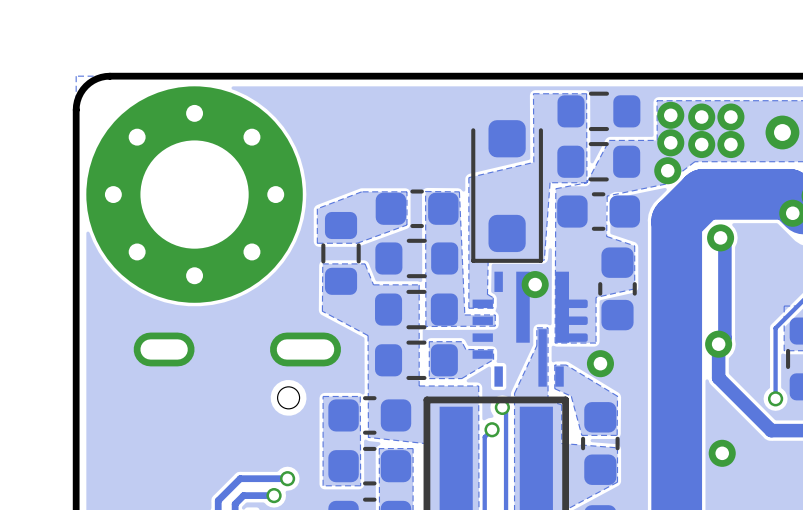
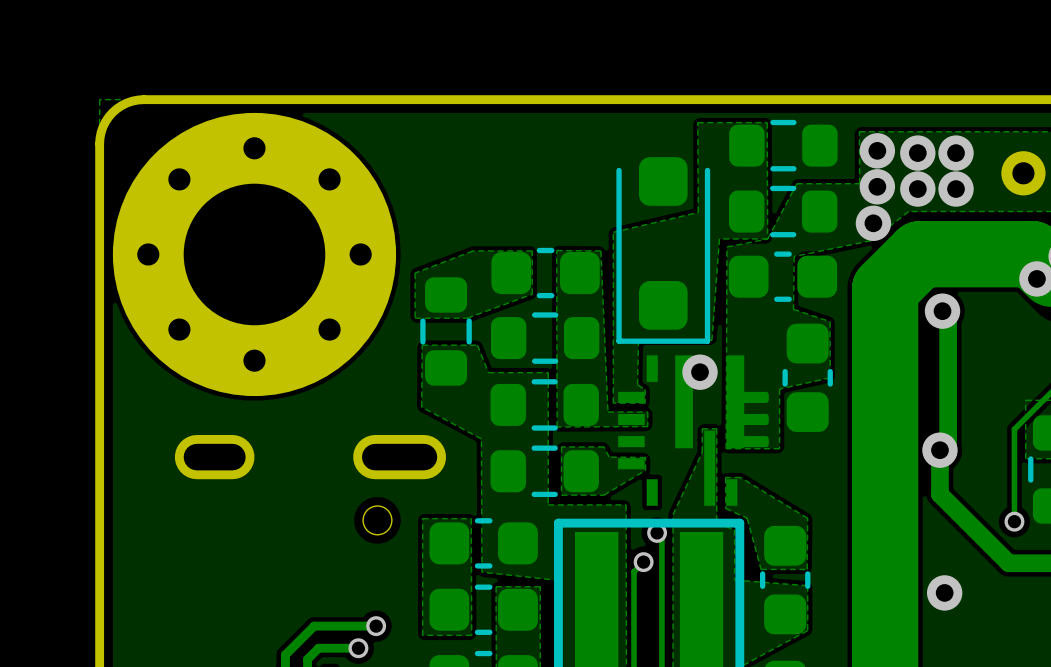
via: (600, 363) -> none

